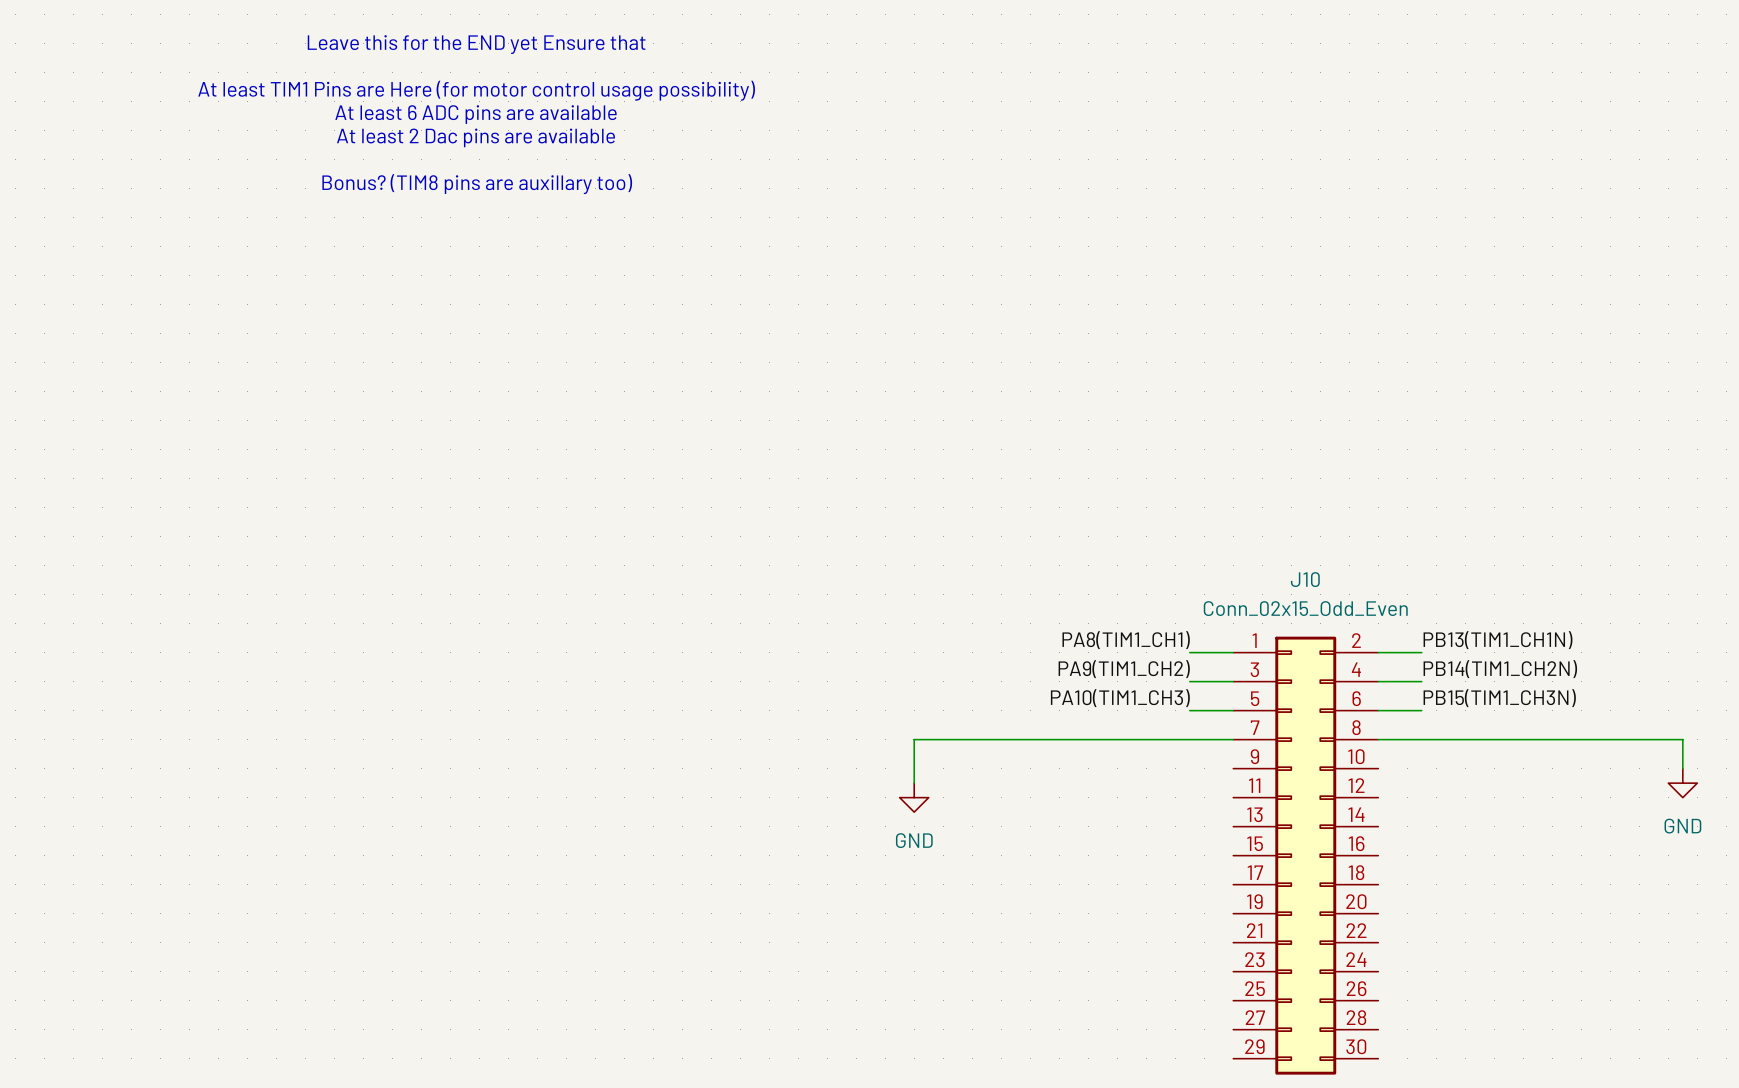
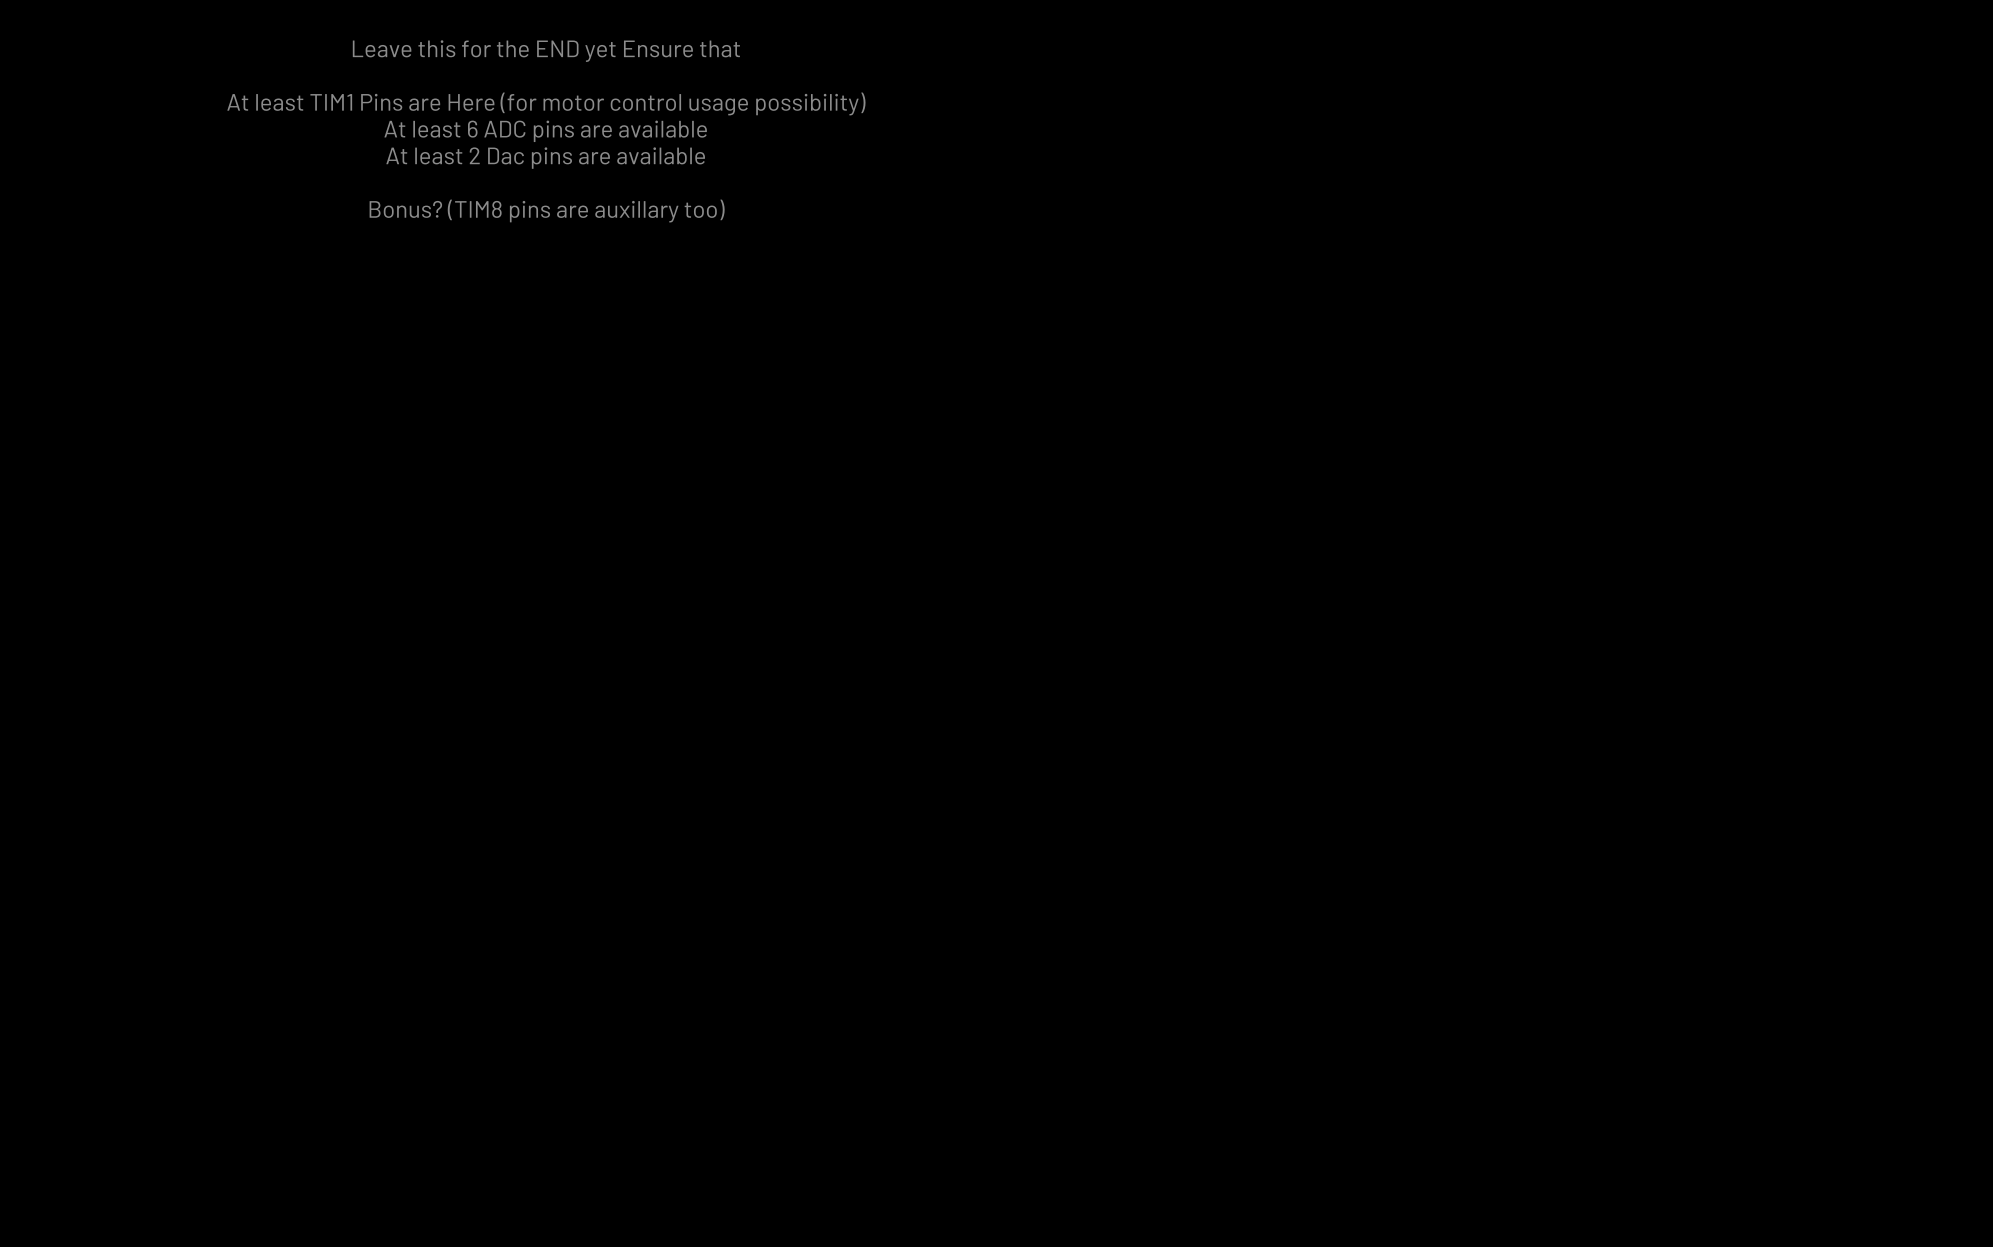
label: PA8(TIM1_CH1) (1126, 640) -> none
label: PB13(TIM1_CH1N) (1498, 640) -> none
wire: (1189, 652) (1233, 652) -> none
wire: (1378, 652) (1421, 652) -> none
label: PA9(TIM1_CH2) (1124, 669) -> none
label: PB14(TIM1_CH2N) (1500, 669) -> none
wire: (1189, 681) (1233, 681) -> none
wire: (1378, 681) (1421, 681) -> none
label: PA10(TIM1_CH3) (1120, 698) -> none
label: PB15(TIM1_CH3N) (1499, 698) -> none
wire: (1189, 710) (1233, 710) -> none
wire: (1378, 710) (1421, 710) -> none
wire: (1233, 739) (914, 739) (914, 783) -> none
wire: (1378, 739) (1682, 739) (1682, 768) -> none
power symbol: GND (1682, 783) -> none
power symbol: GND (914, 797) -> none
J10: Conn_02x15_Odd_Even (1305, 855) -> none

